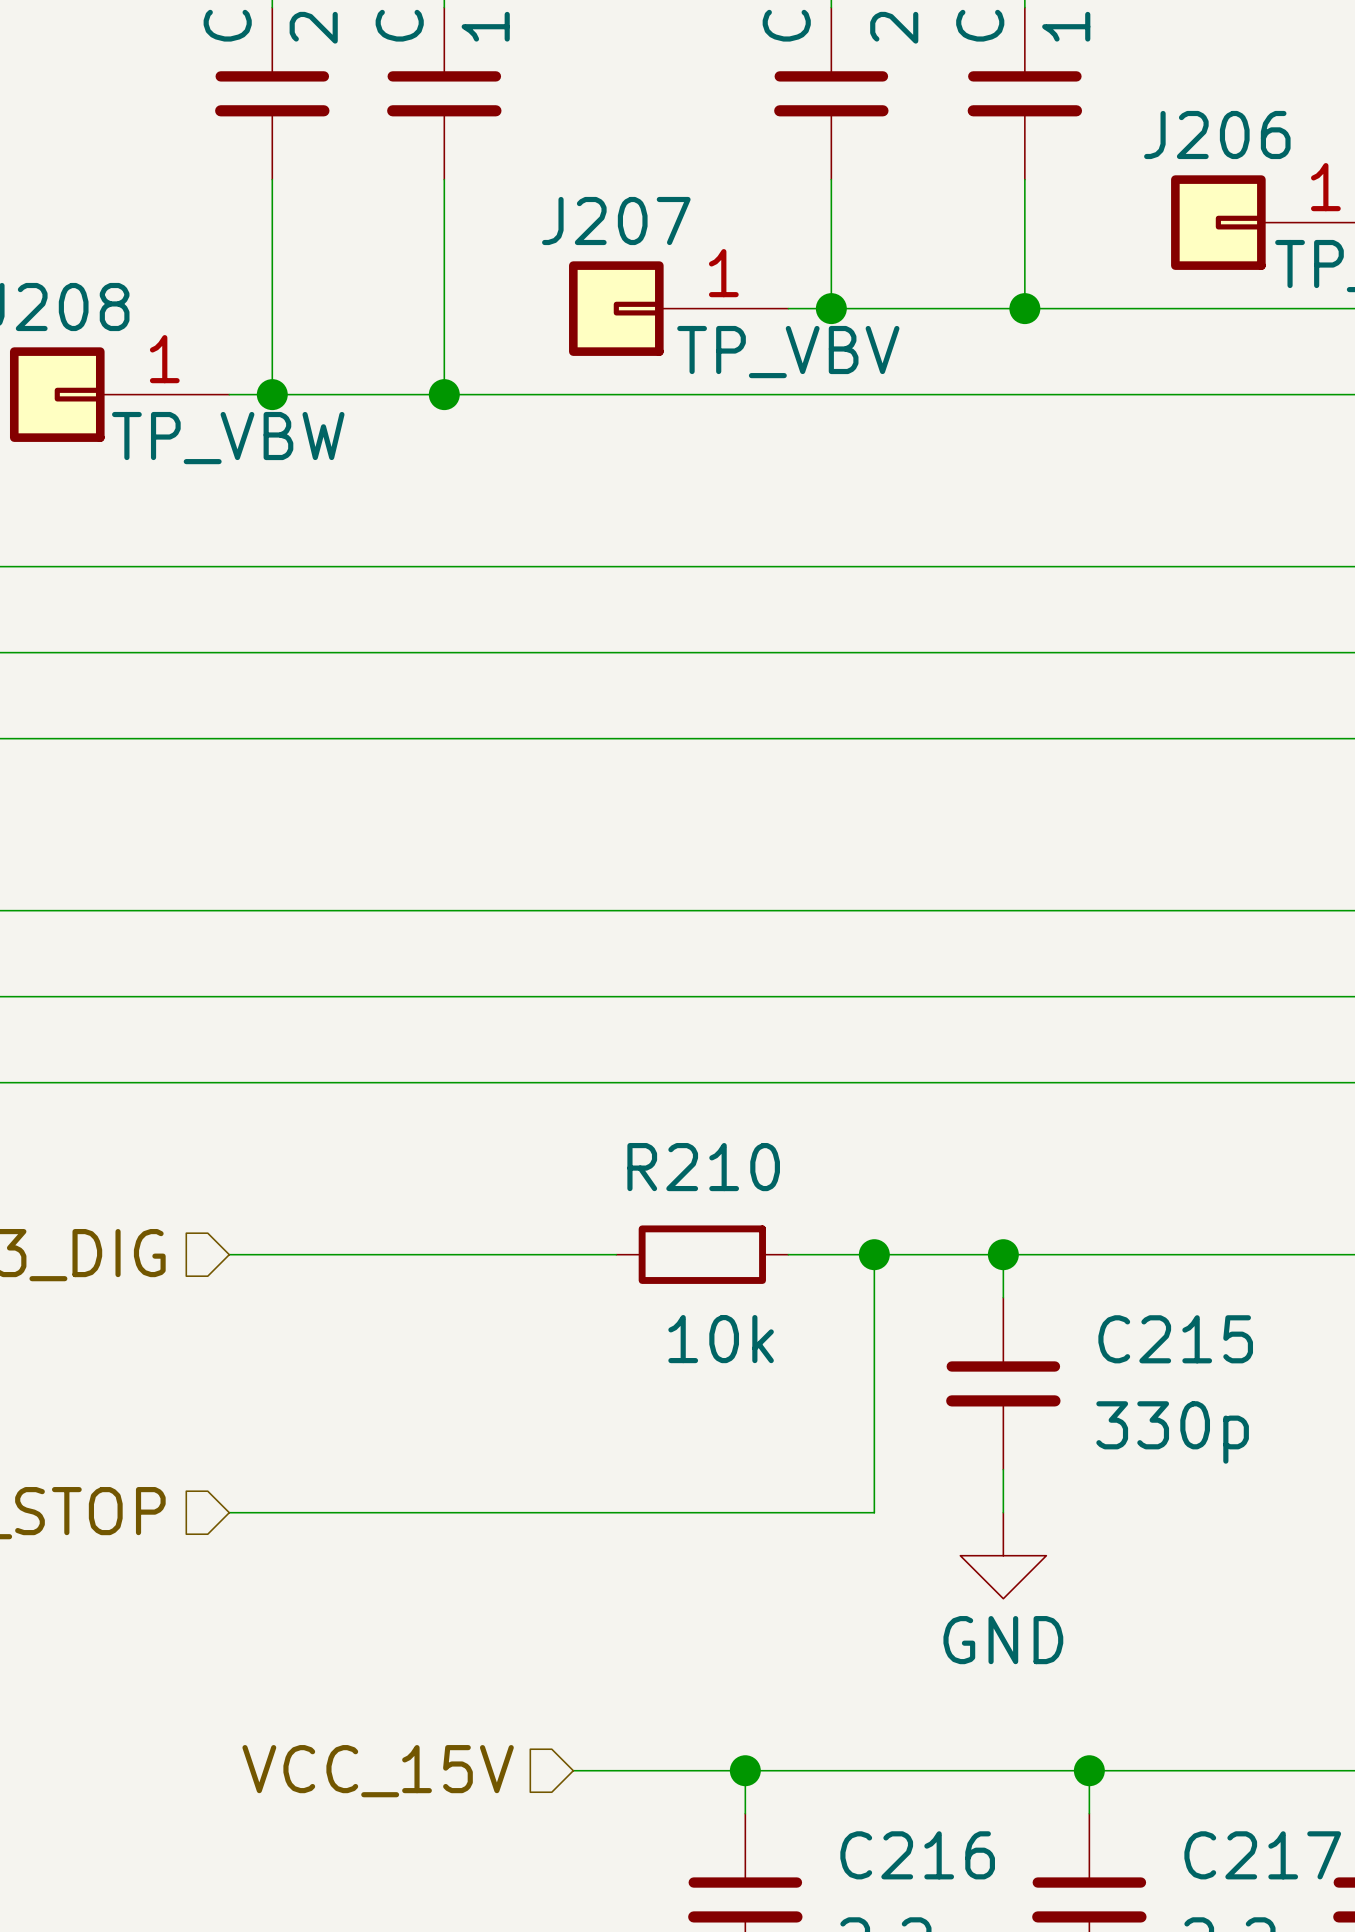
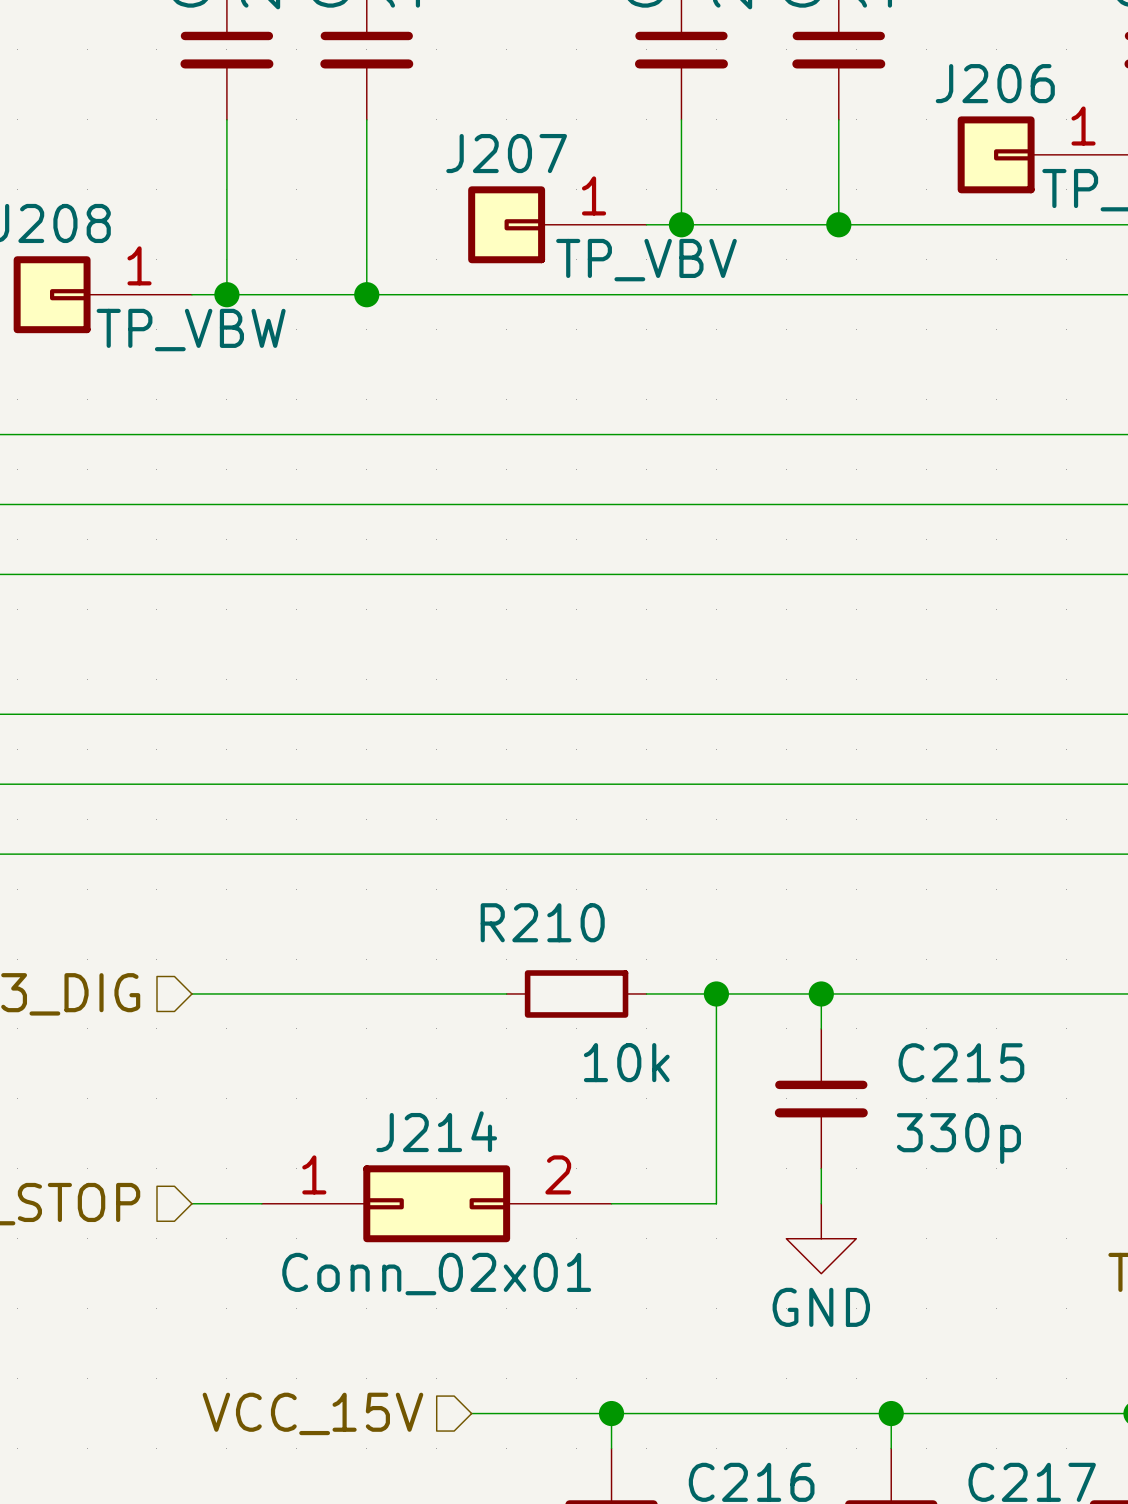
R210 name position: R210 (703, 1167) -> R210 (542, 922)
R210 value position: 10k (721, 1339) -> 10k (626, 1062)
J214: none -> Conn_02x01 (436, 1203)

